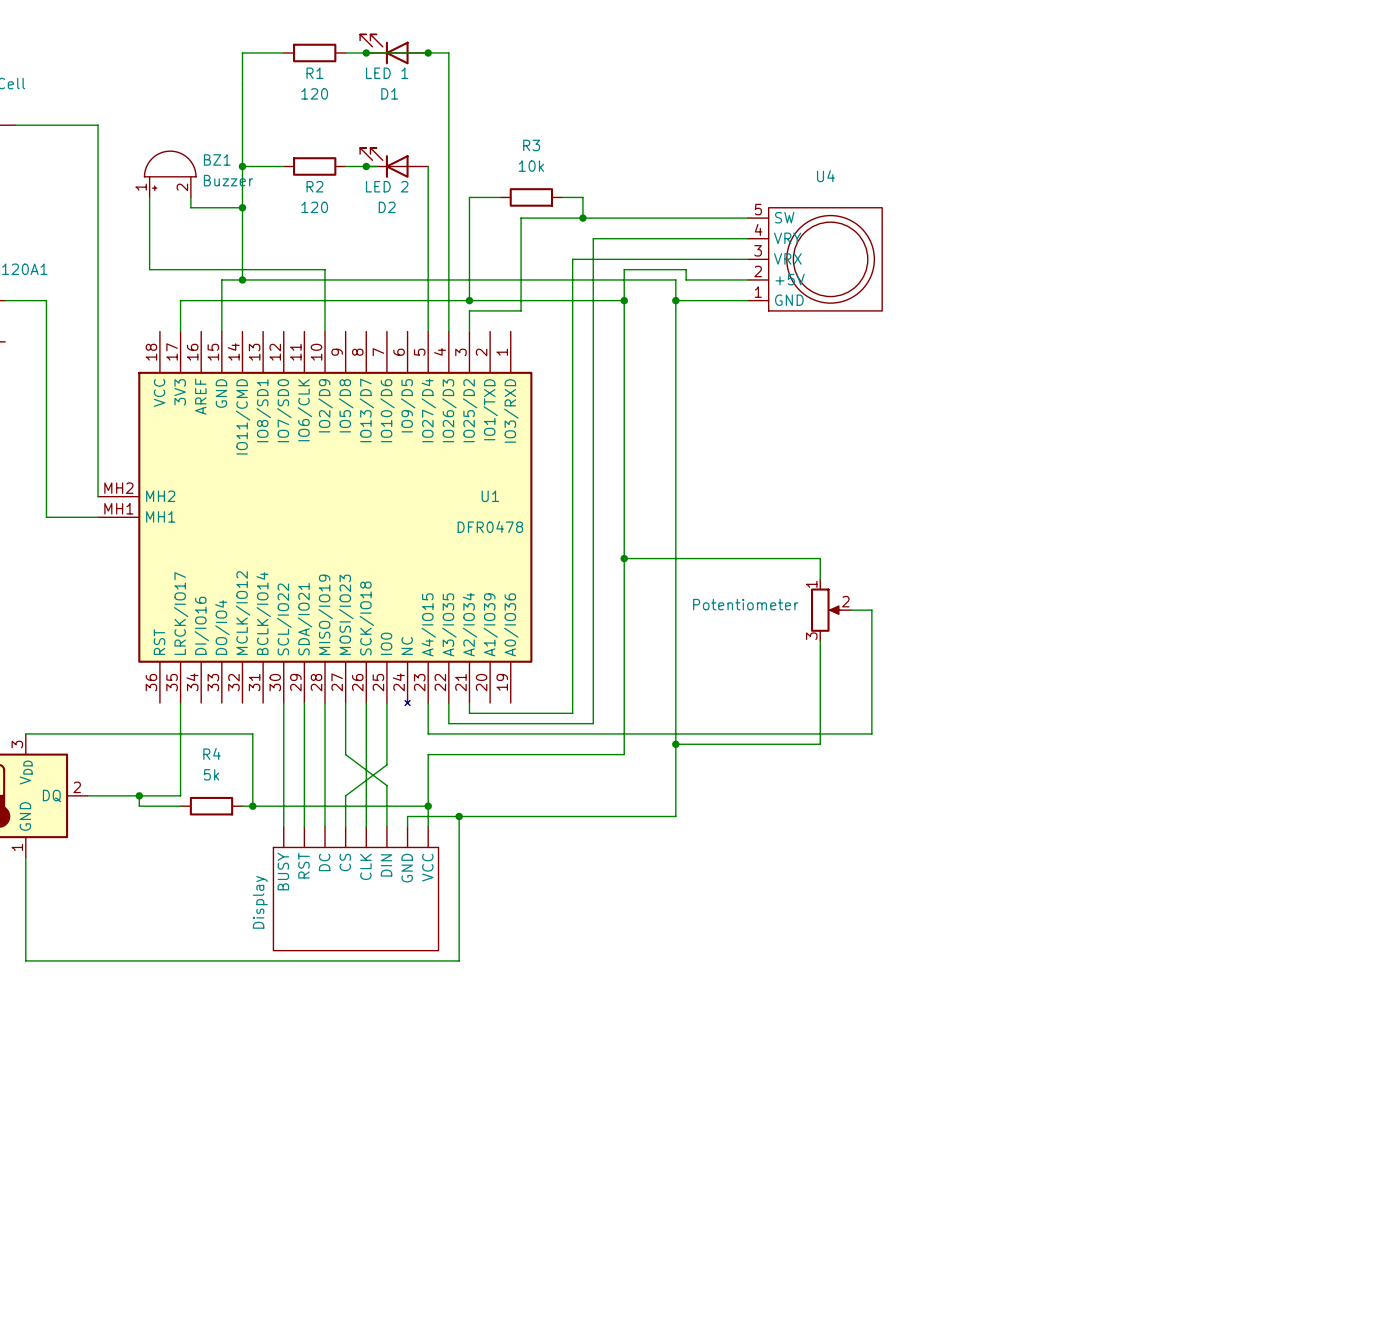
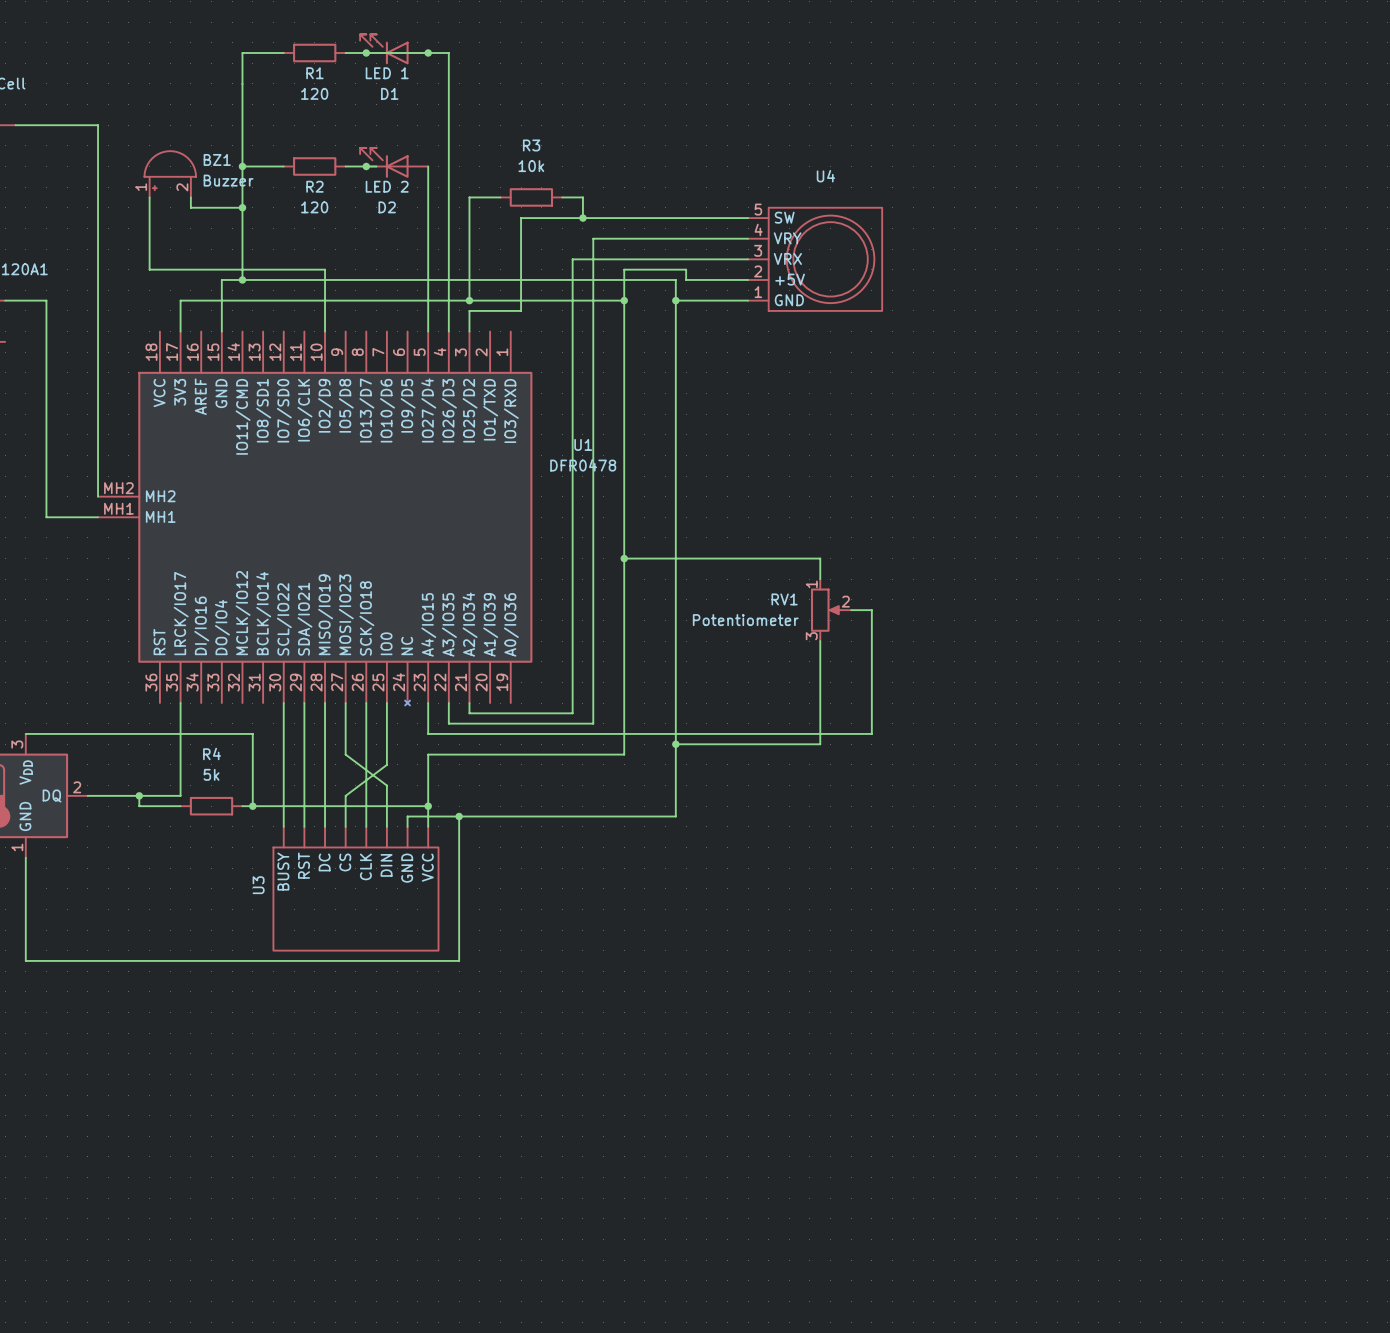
U1 name position: U1 (490, 496) -> U1 (583, 444)
U1 value position: DFR0478 (490, 526) -> DFR0478 (583, 465)
Potentiometer name: Potentiometer (745, 604) -> RV1 (784, 599)
Potentiometer value: none -> Potentiometer (745, 620)
Display name: Display (260, 902) -> U3 (258, 885)

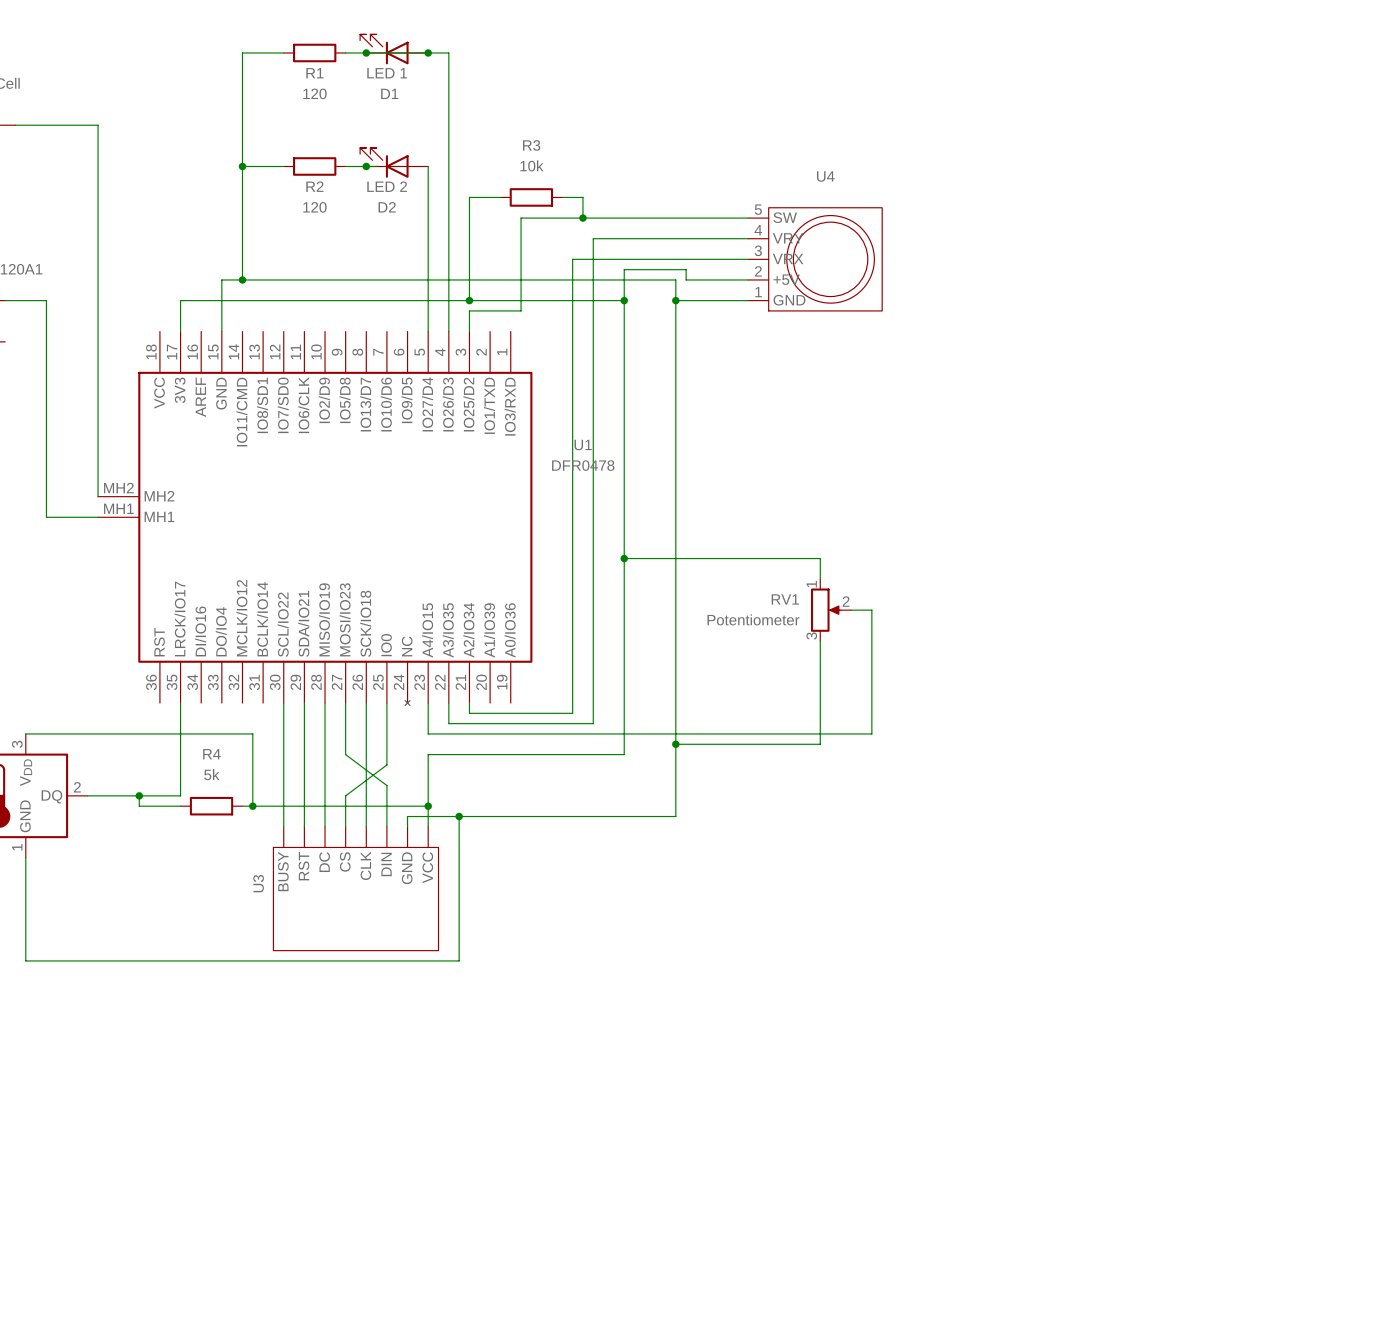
BZ1: Buzzer (170, 174) -> none
wire: (149, 197) (149, 269) (325, 269) (325, 331) -> none
wire: (190, 197) (190, 207) (242, 207) -> none
junction: (242, 207) -> none

